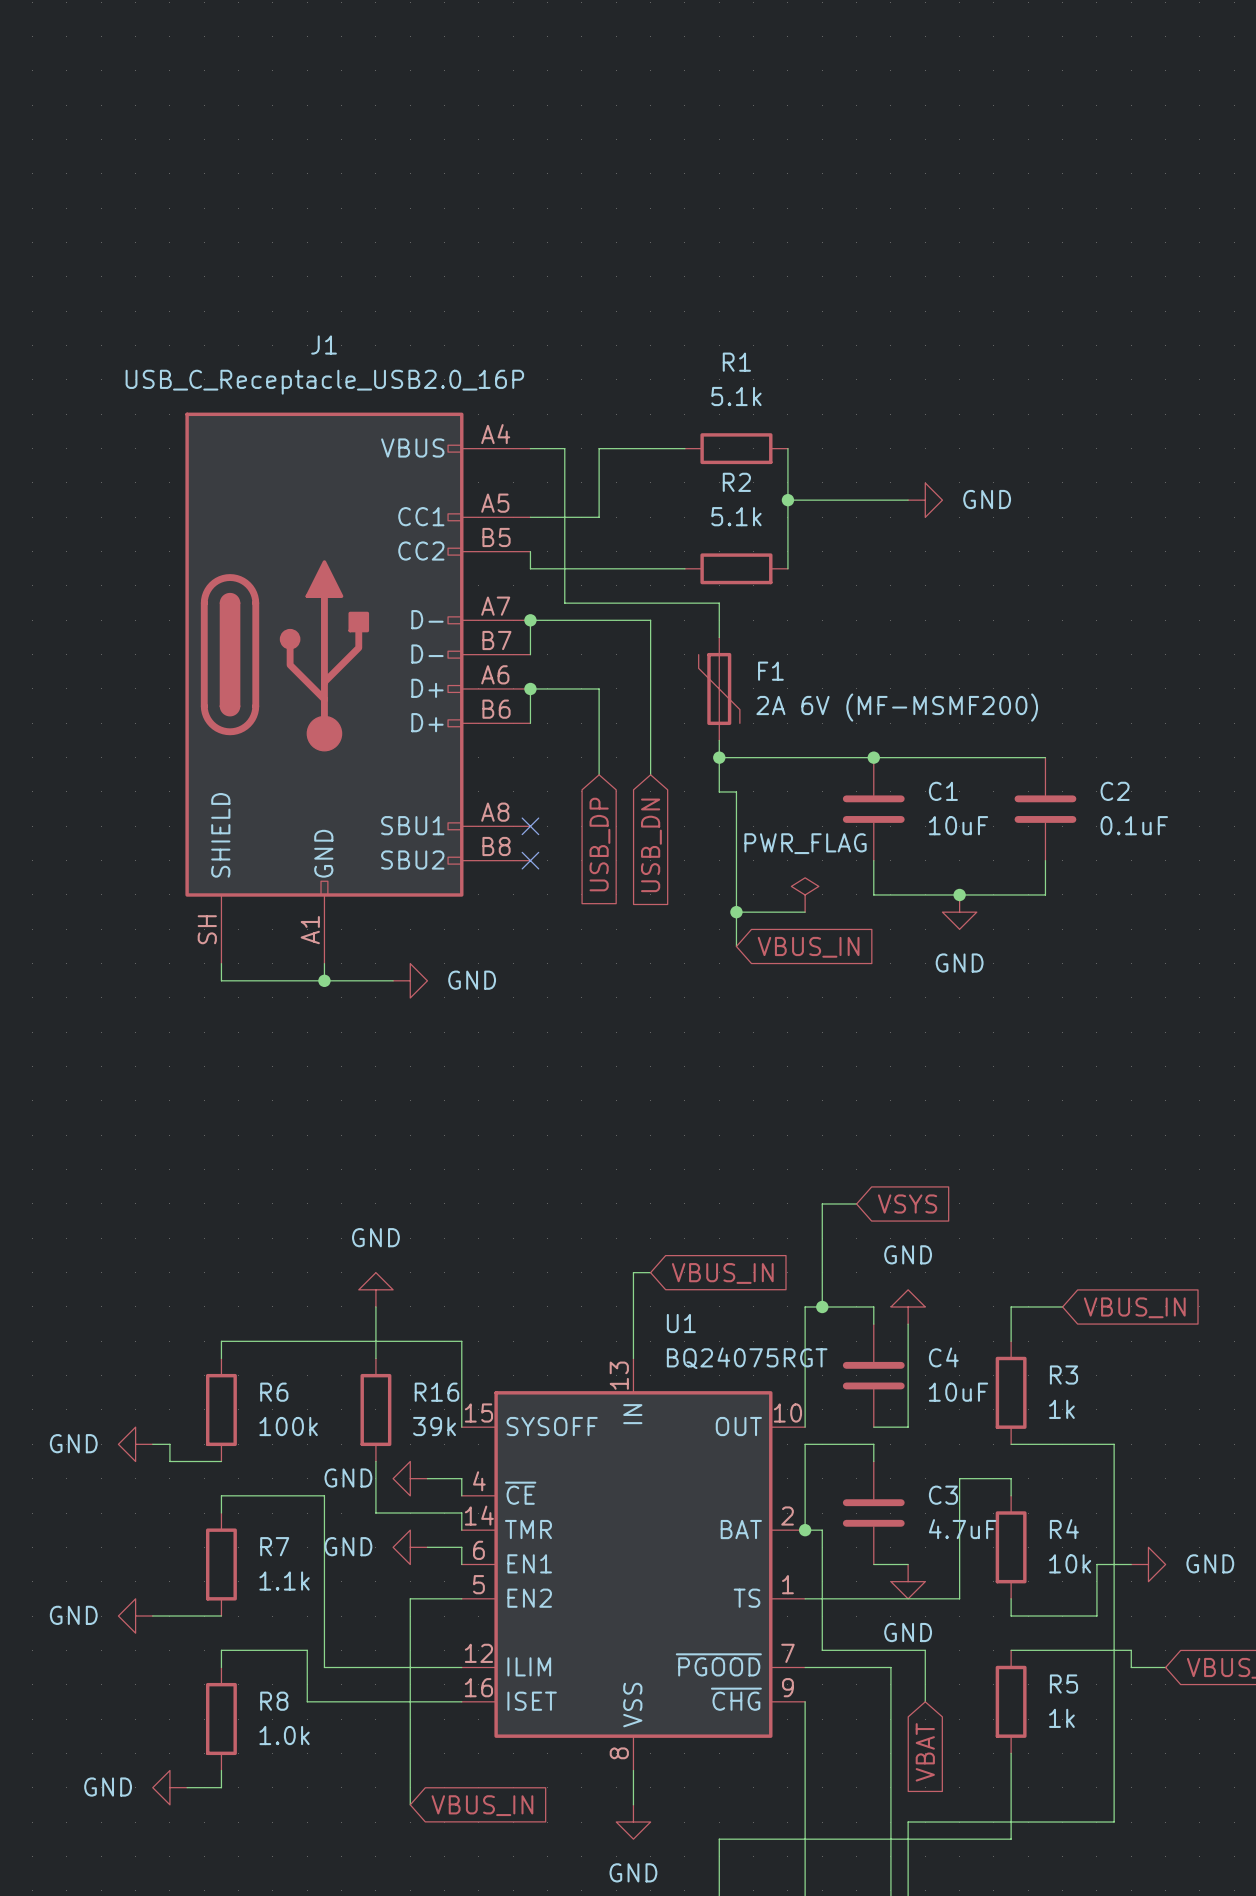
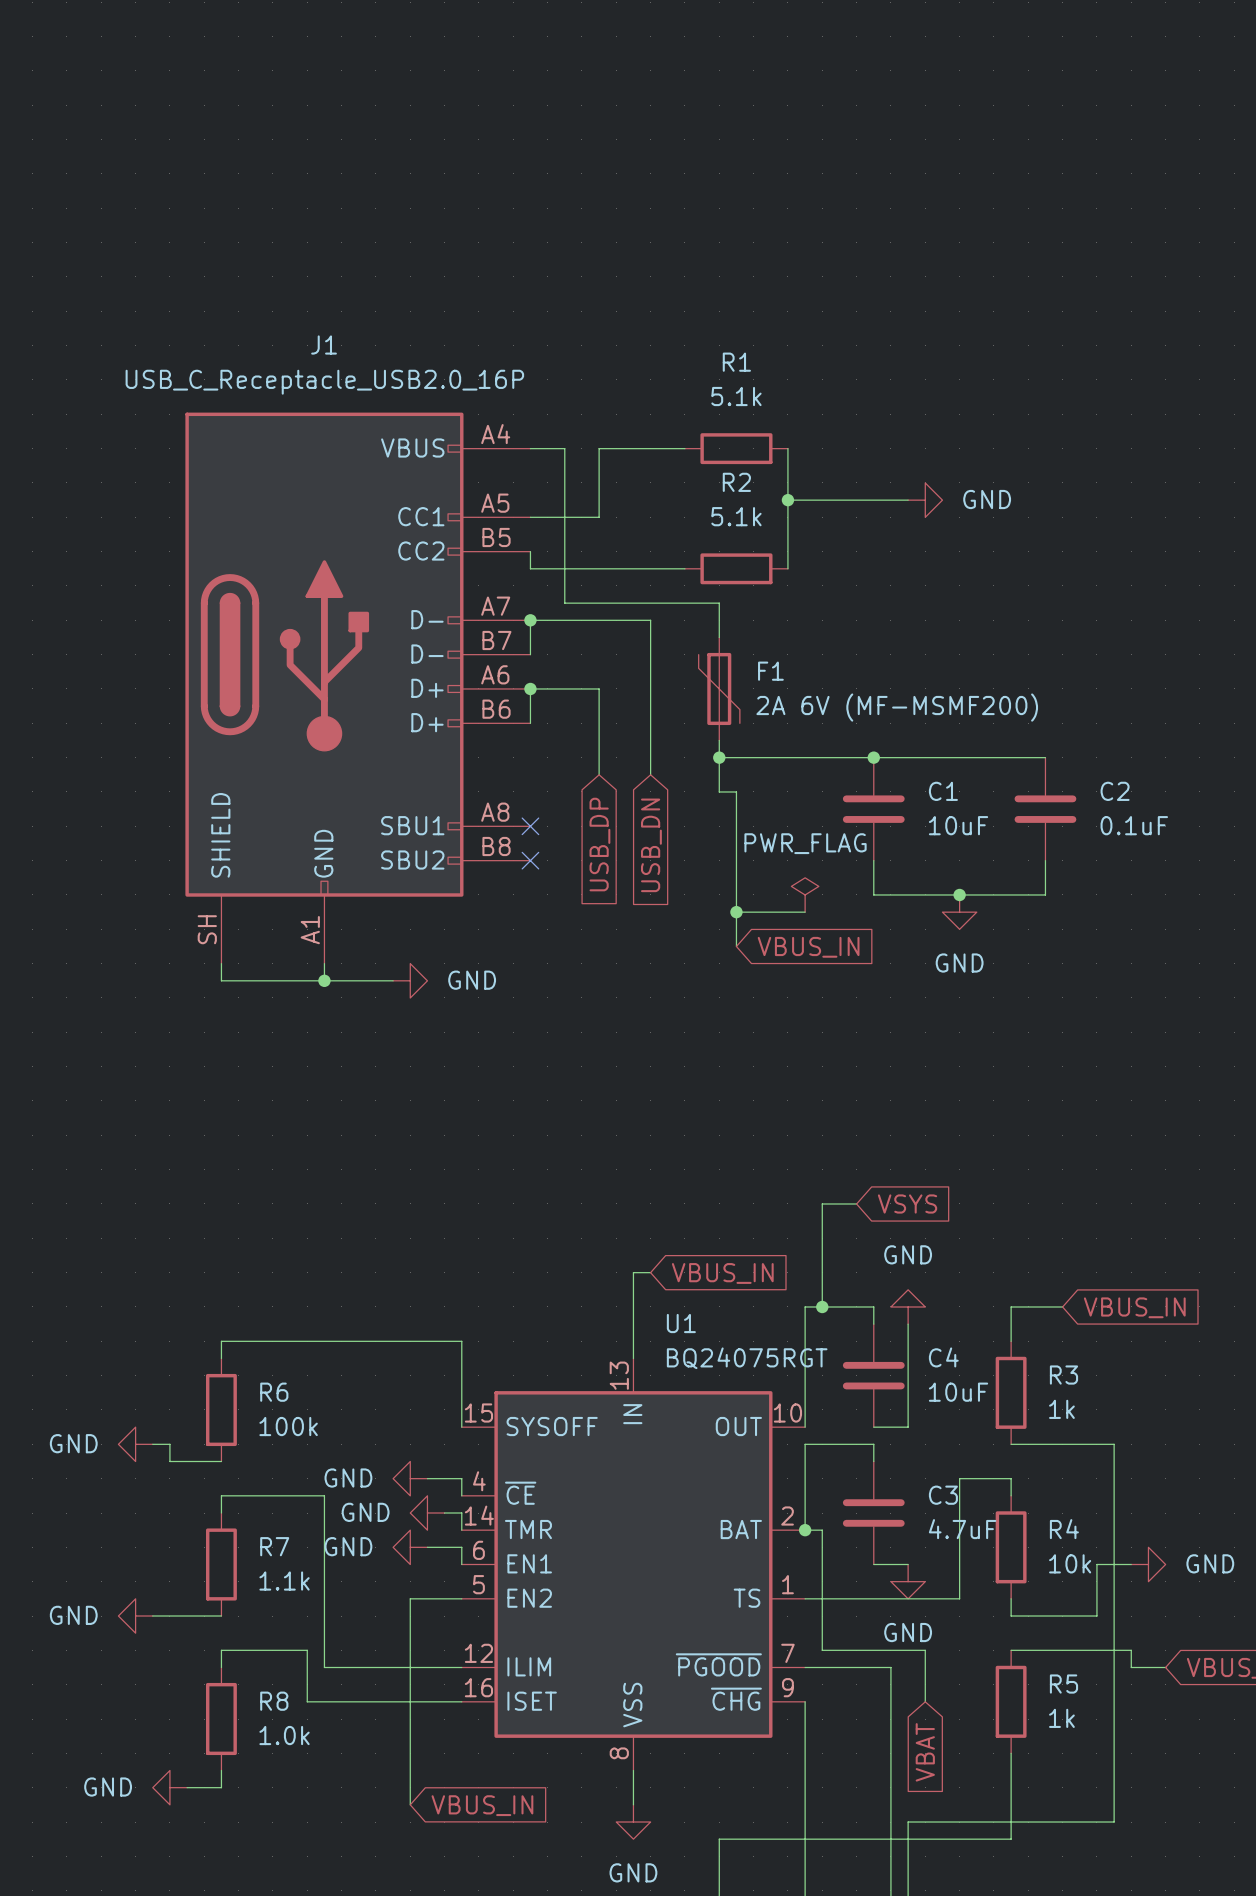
power symbol rotation: 0° (375, 1289) -> 90° counterclockwise (427, 1513)
power symbol position: GND (375, 1289) -> GND (427, 1513)
wire: (375, 1306) (375, 1358) -> none
R16: 39k (375, 1409) -> none
wire: (375, 1461) (375, 1513) (444, 1513) -> none

